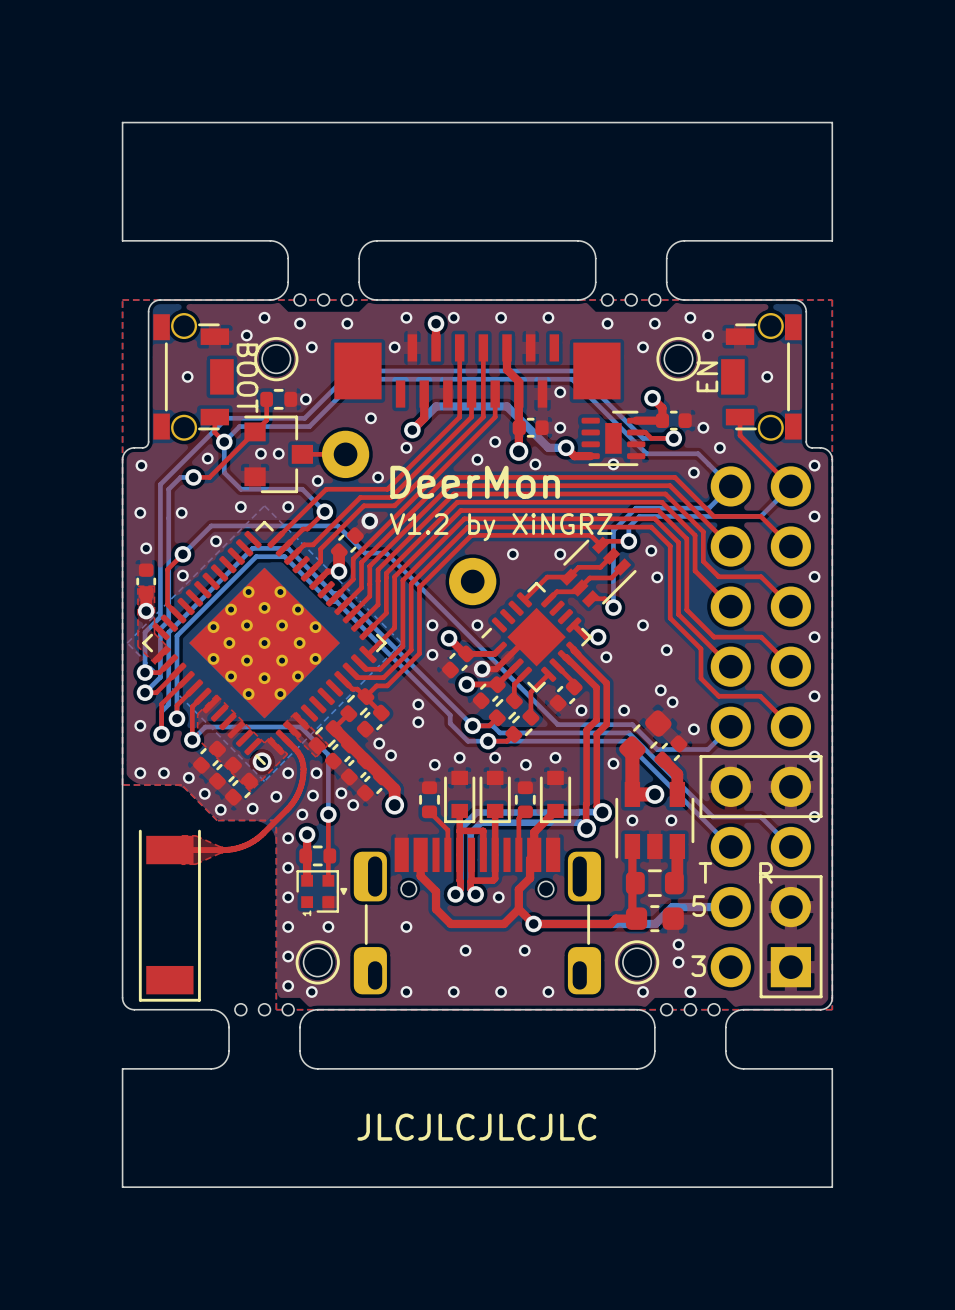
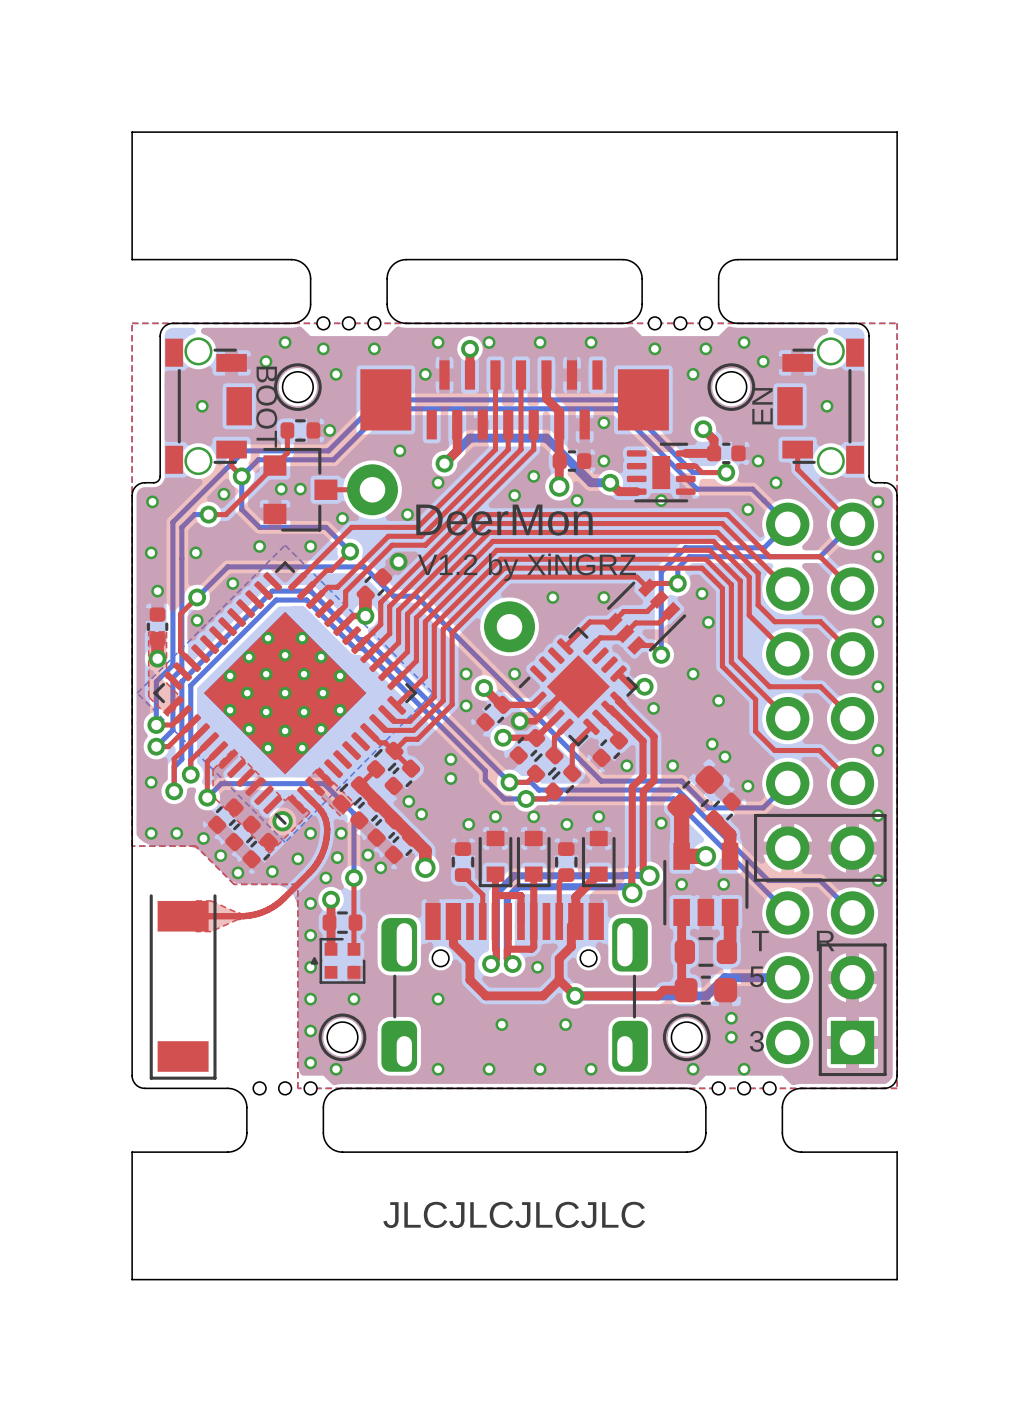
part footprint: [296, 870, 348, 913] -> [310, 937, 366, 984]

